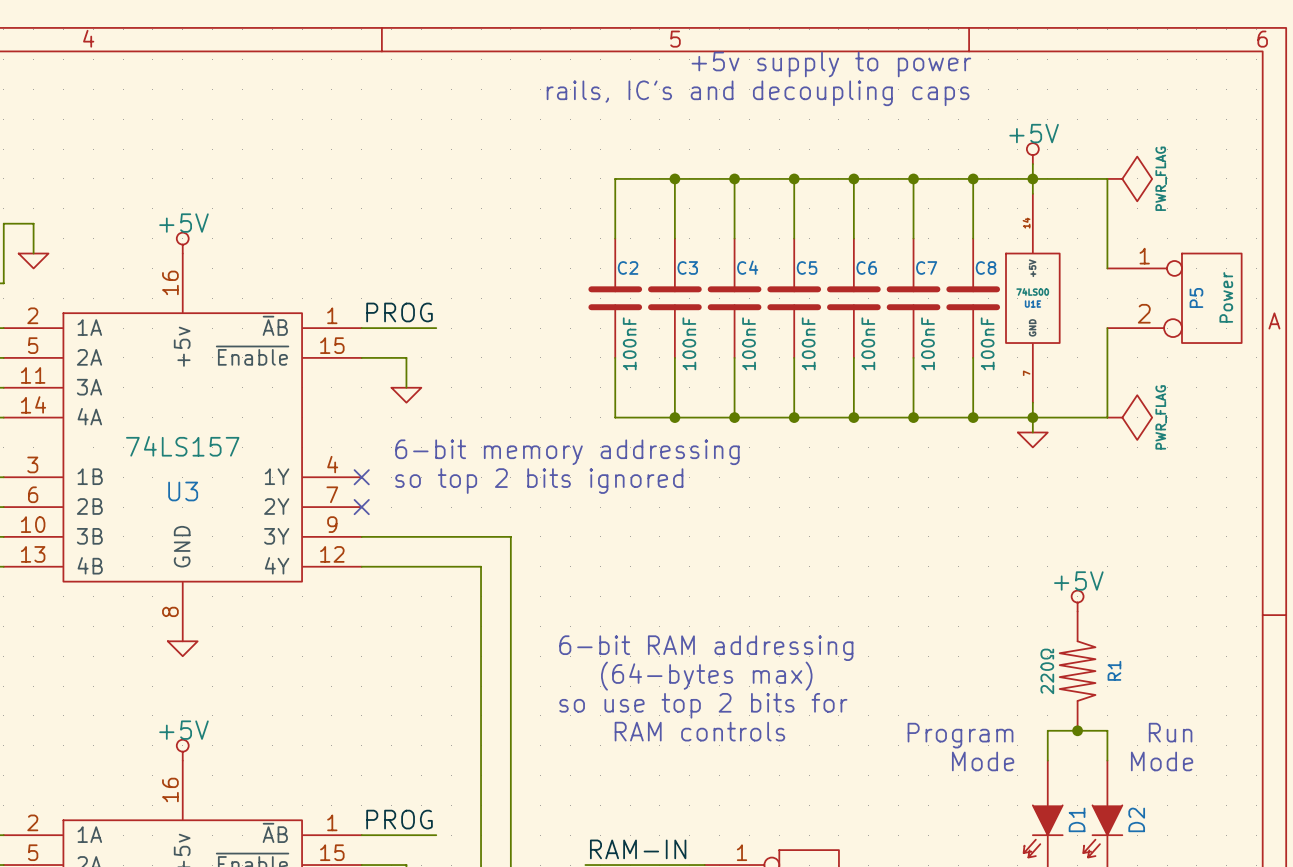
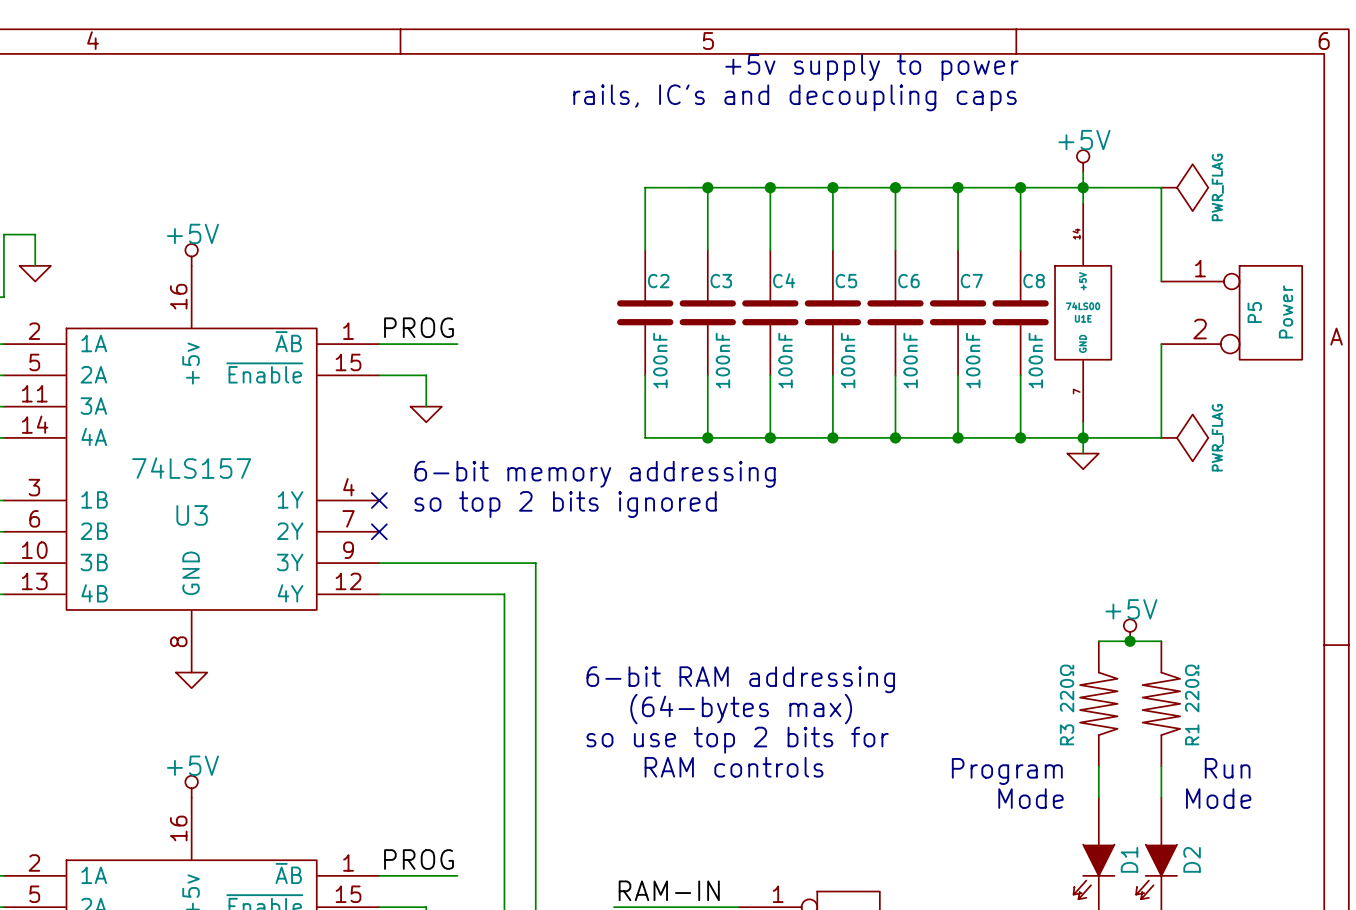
junction: none -> (1130, 641)
R1 name position: R1 (1114, 670) -> R1 (1192, 734)
R1 value position: 220Ω (1047, 671) -> 220Ω (1192, 688)
R3: none -> 220Ω (1098, 703)
R1 position: (1077, 671) -> (1161, 703)
wire: (1047, 730) (1107, 730) -> (1098, 641) (1161, 641)
junction: (1077, 730) -> none

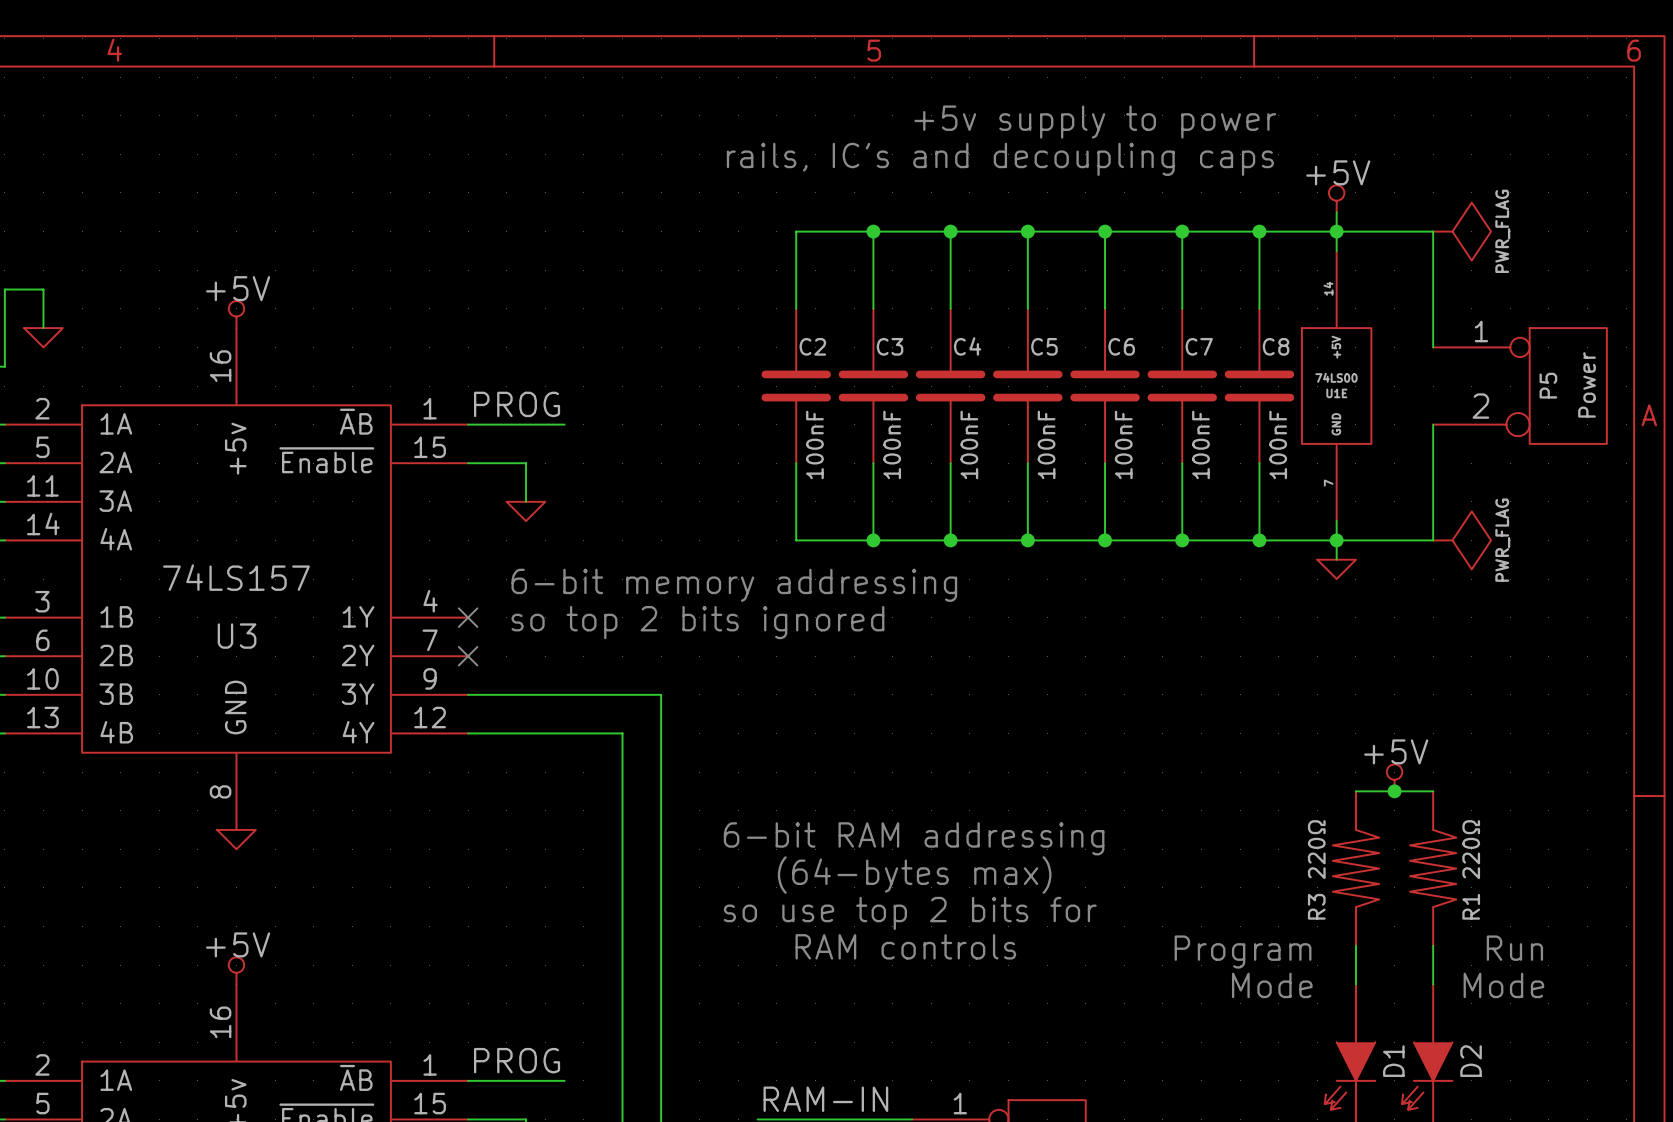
text position: +5v supply to power (871, 67) -> +5v supply to power (1095, 122)
text position: rails, IC's and decoupling caps (795, 97) -> rails, IC's and decoupling caps (1000, 159)

